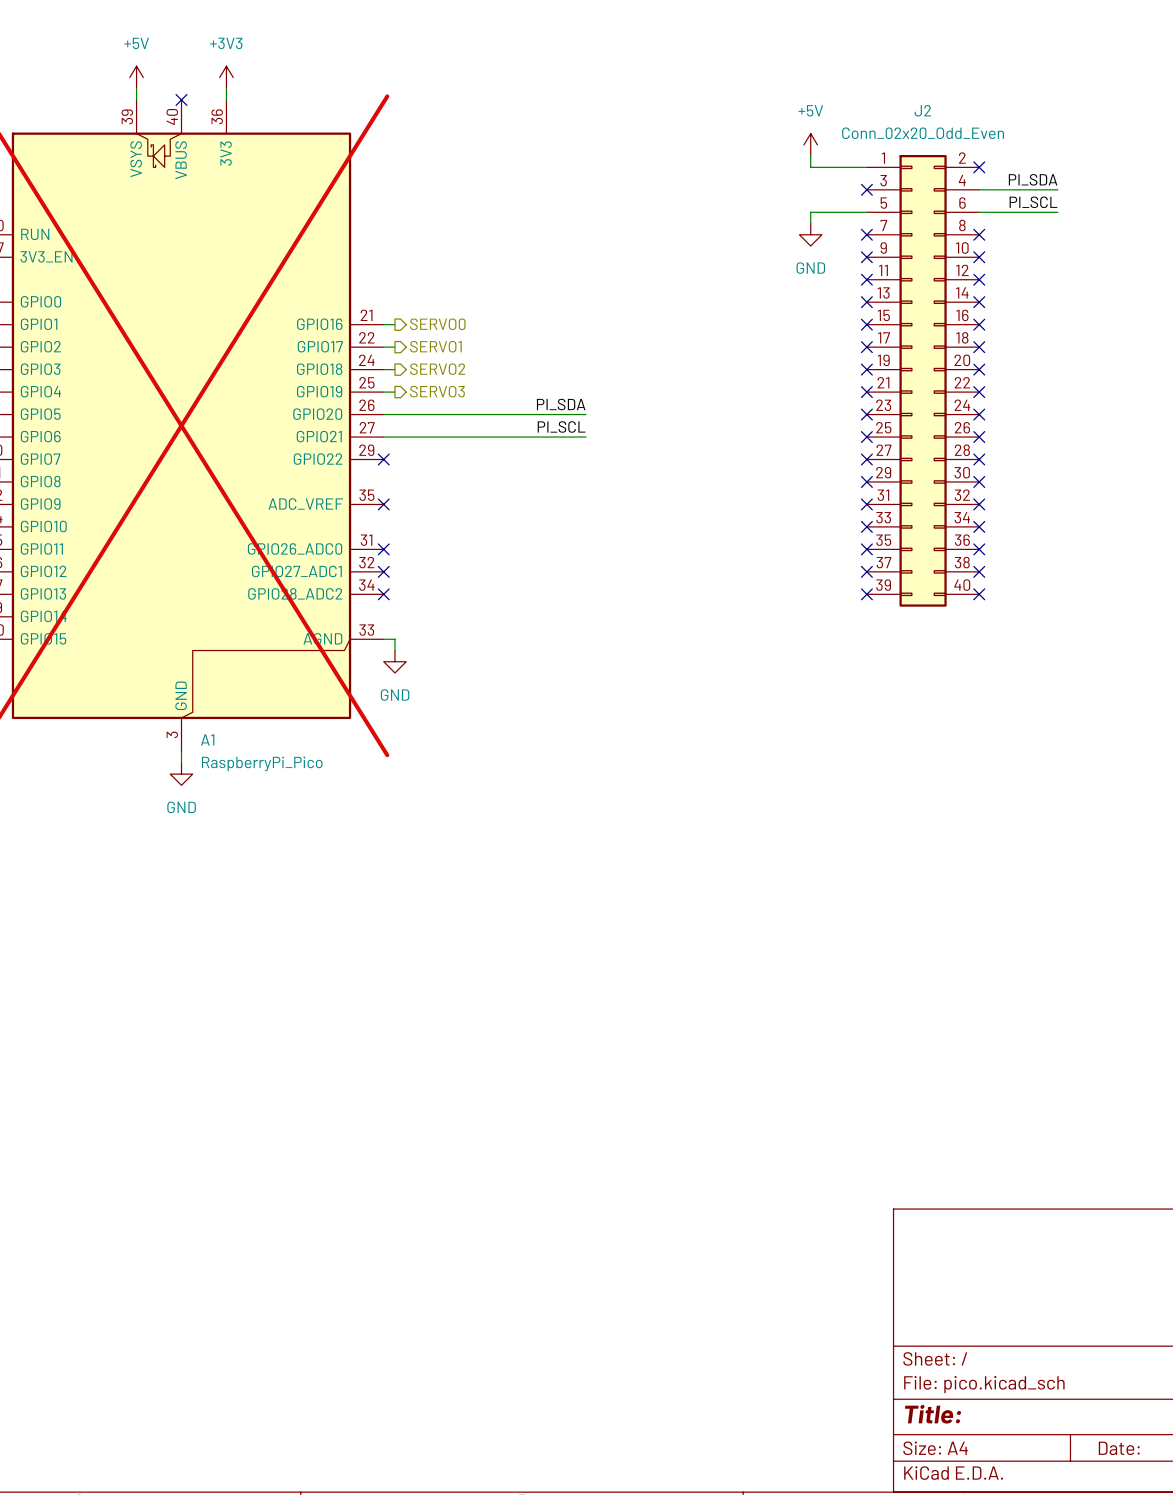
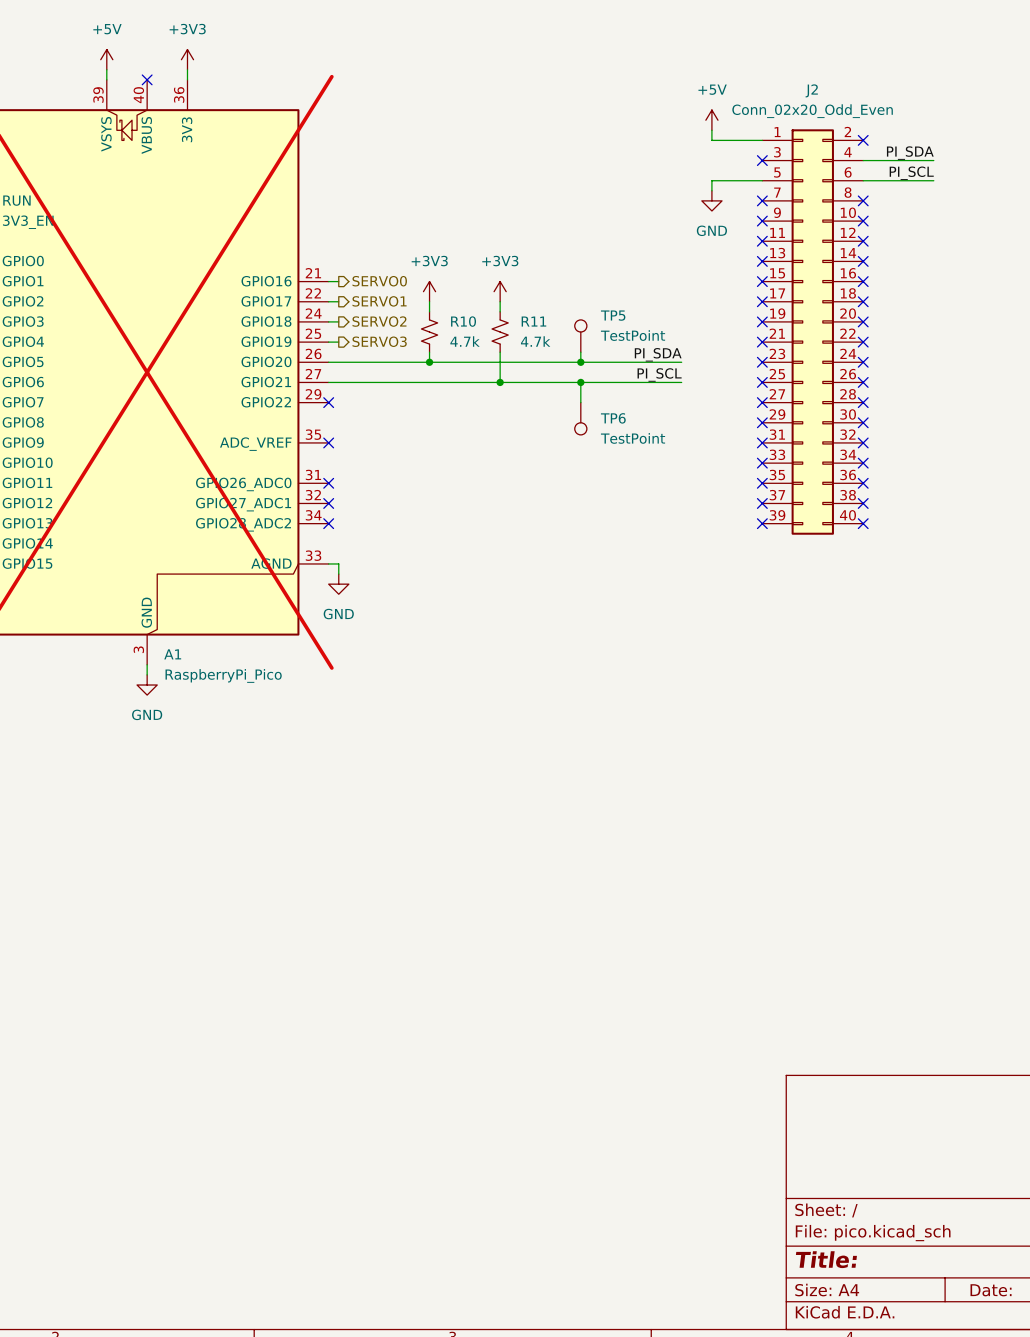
power symbol: none -> +3V3 (429, 291)
power symbol: none -> +3V3 (500, 291)
wire: none -> (429, 301) (429, 311)
wire: none -> (500, 301) (500, 311)
R10: none -> 4.7k (429, 332)
R11: none -> 4.7k (500, 332)
TP5: none -> TestPoint (580, 336)
wire: none -> (429, 352) (429, 362)
wire: none -> (500, 352) (500, 382)
wire: none -> (580, 352) (580, 362)
label position: PI_SDA (561, 404) -> PI_SDA (658, 354)
junction: none -> (429, 362)
wire: none -> (510, 362) (681, 362)
junction: none -> (580, 362)
label position: PI_SCL (561, 427) -> PI_SCL (659, 374)
junction: none -> (500, 382)
wire: none -> (510, 382) (681, 382)
wire: none -> (580, 382) (580, 402)
junction: none -> (580, 382)
TP6: none -> TestPoint (580, 418)

